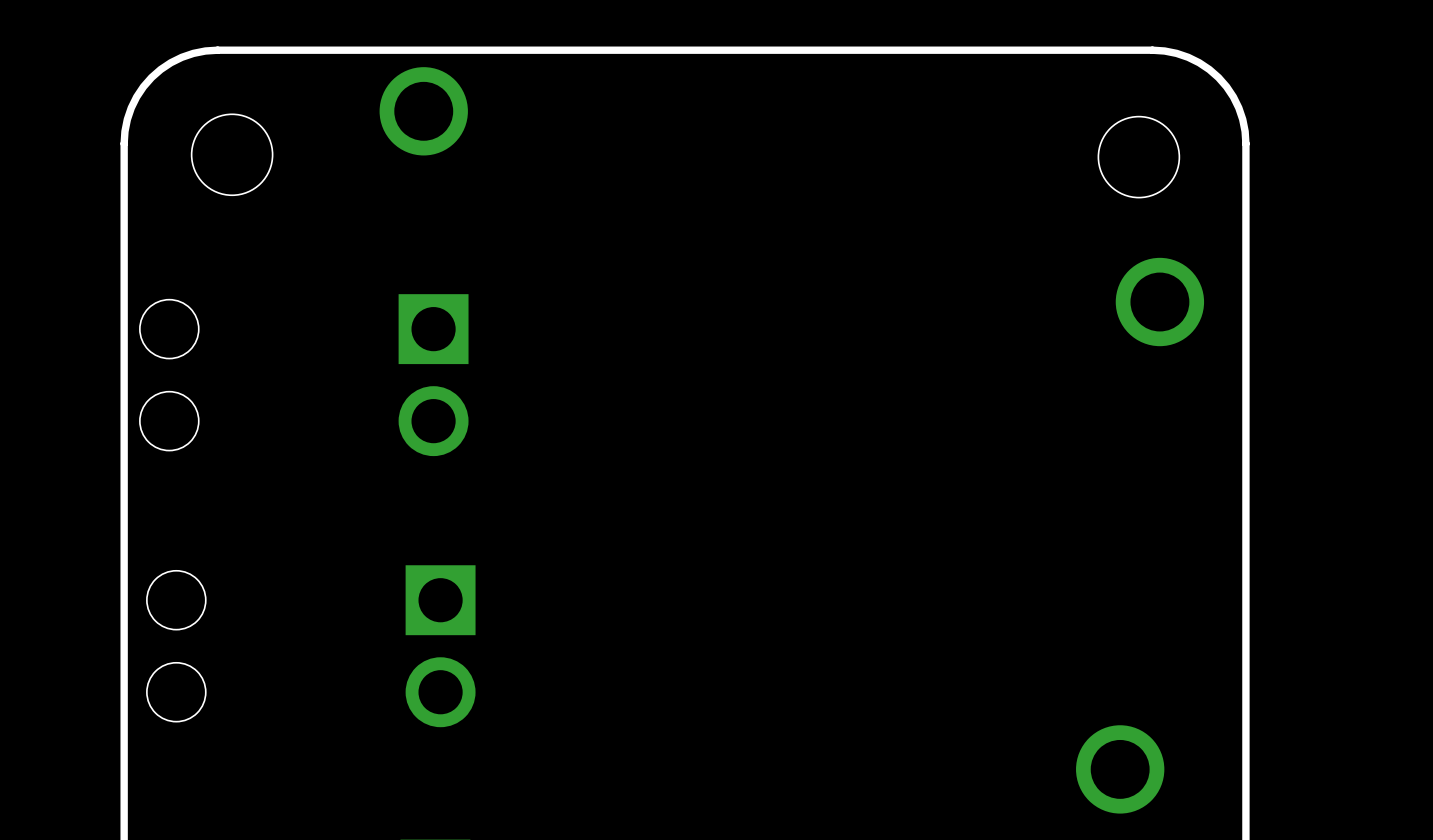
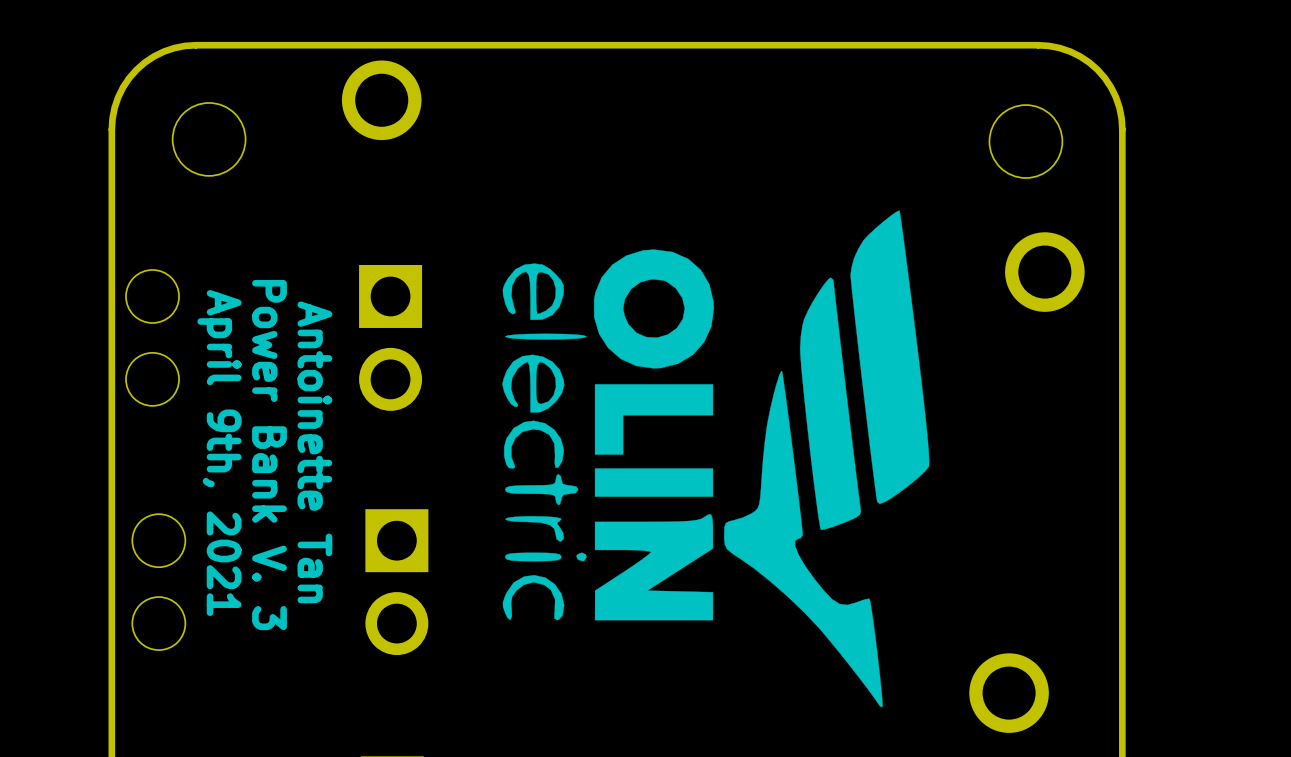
drawing: none -> [502, 210, 930, 708]
text: none -> April 9th, 2021 (219, 453)
text: none -> Antoinette Tan (314, 452)
text: none -> Power Bank V. 3 (269, 455)

